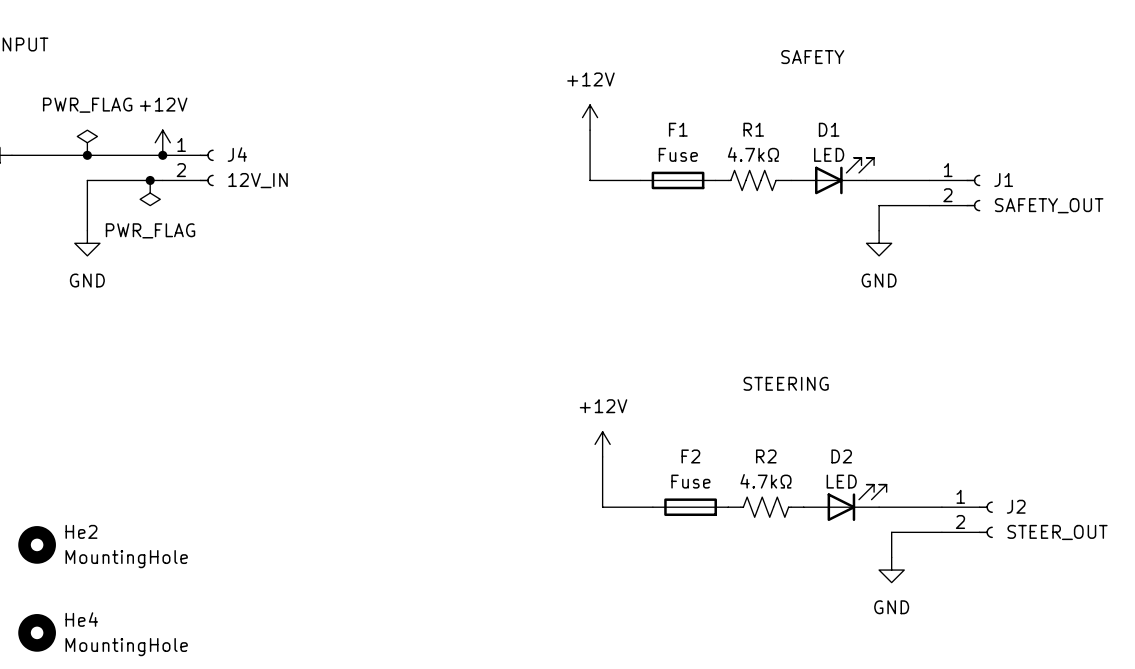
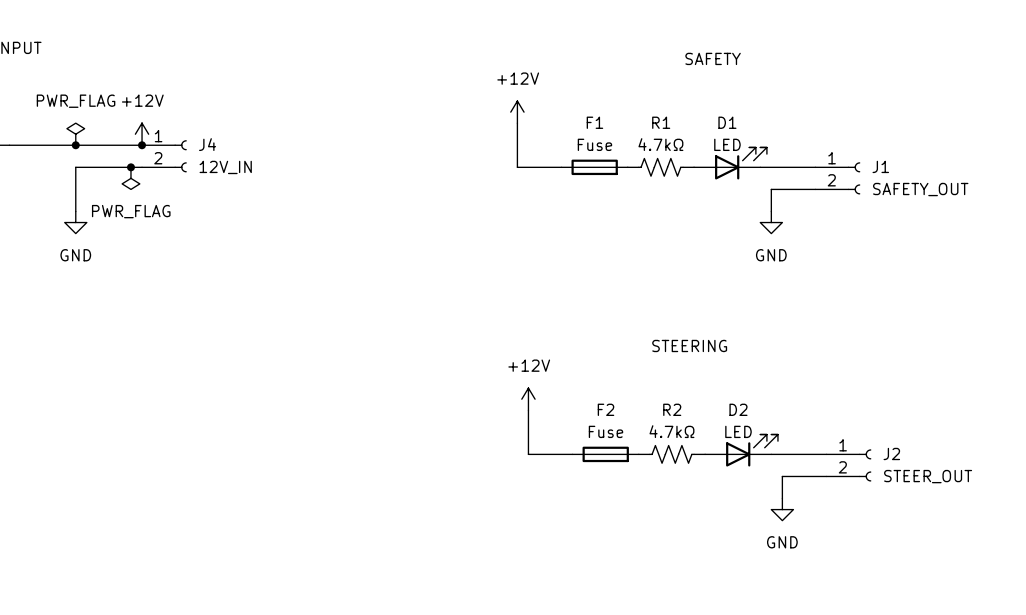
He2: MountingHole (37, 544) -> none
He4: MountingHole (37, 632) -> none

